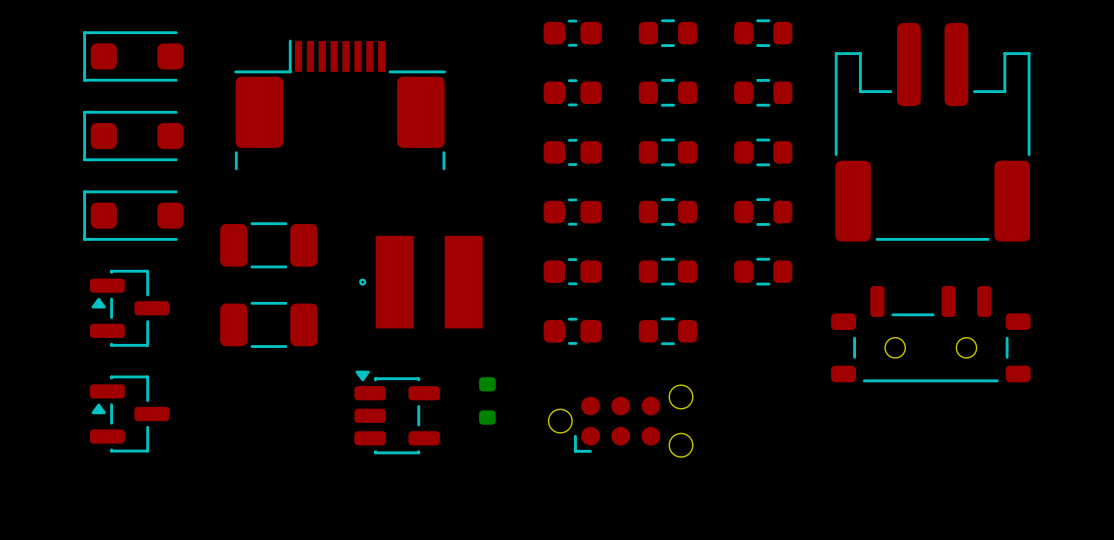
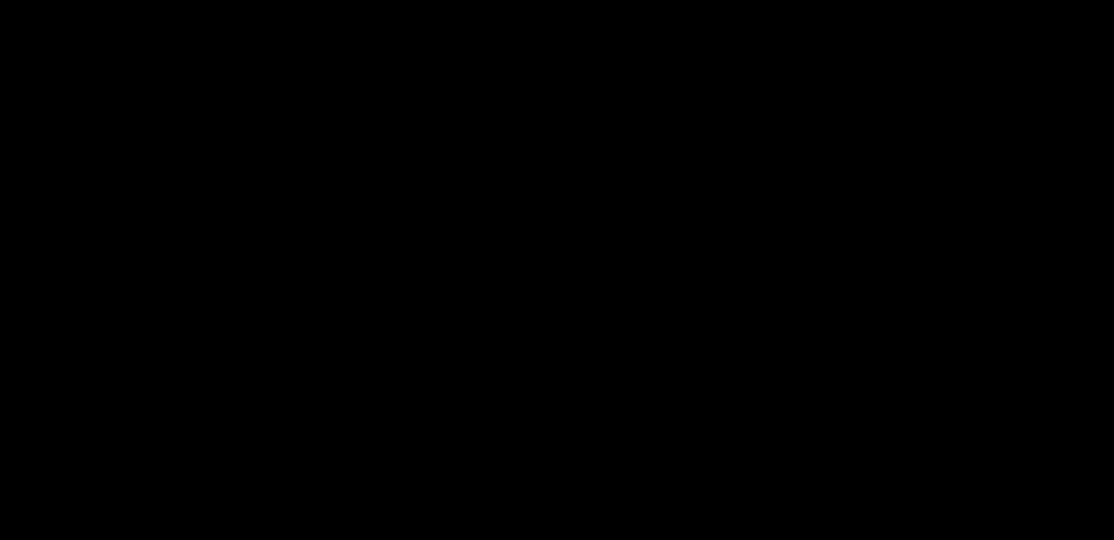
part: (572, 33) -> none
part: (667, 33) -> none
part: (763, 33) -> none
part: (133, 56) -> none
part: (572, 92) -> none
part: (667, 92) -> none
part: (763, 92) -> none
part: (340, 104) -> none
part: (932, 132) -> none
part: (133, 136) -> none
part: (572, 152) -> none
part: (667, 152) -> none
part: (763, 152) -> none
part: (572, 212) -> none
part: (667, 212) -> none
part: (763, 212) -> none
part: (133, 215) -> none
part: (268, 245) -> none
part: (572, 271) -> none
part: (667, 271) -> none
part: (763, 271) -> none
part: (420, 282) -> none
part: (129, 308) -> none
part: (268, 324) -> none
part: (572, 331) -> none
part: (667, 331) -> none
part: (930, 334) -> none
part: (487, 400) -> none
part: (397, 412) -> none
part: (129, 413) -> none
part: (620, 421) -> none

